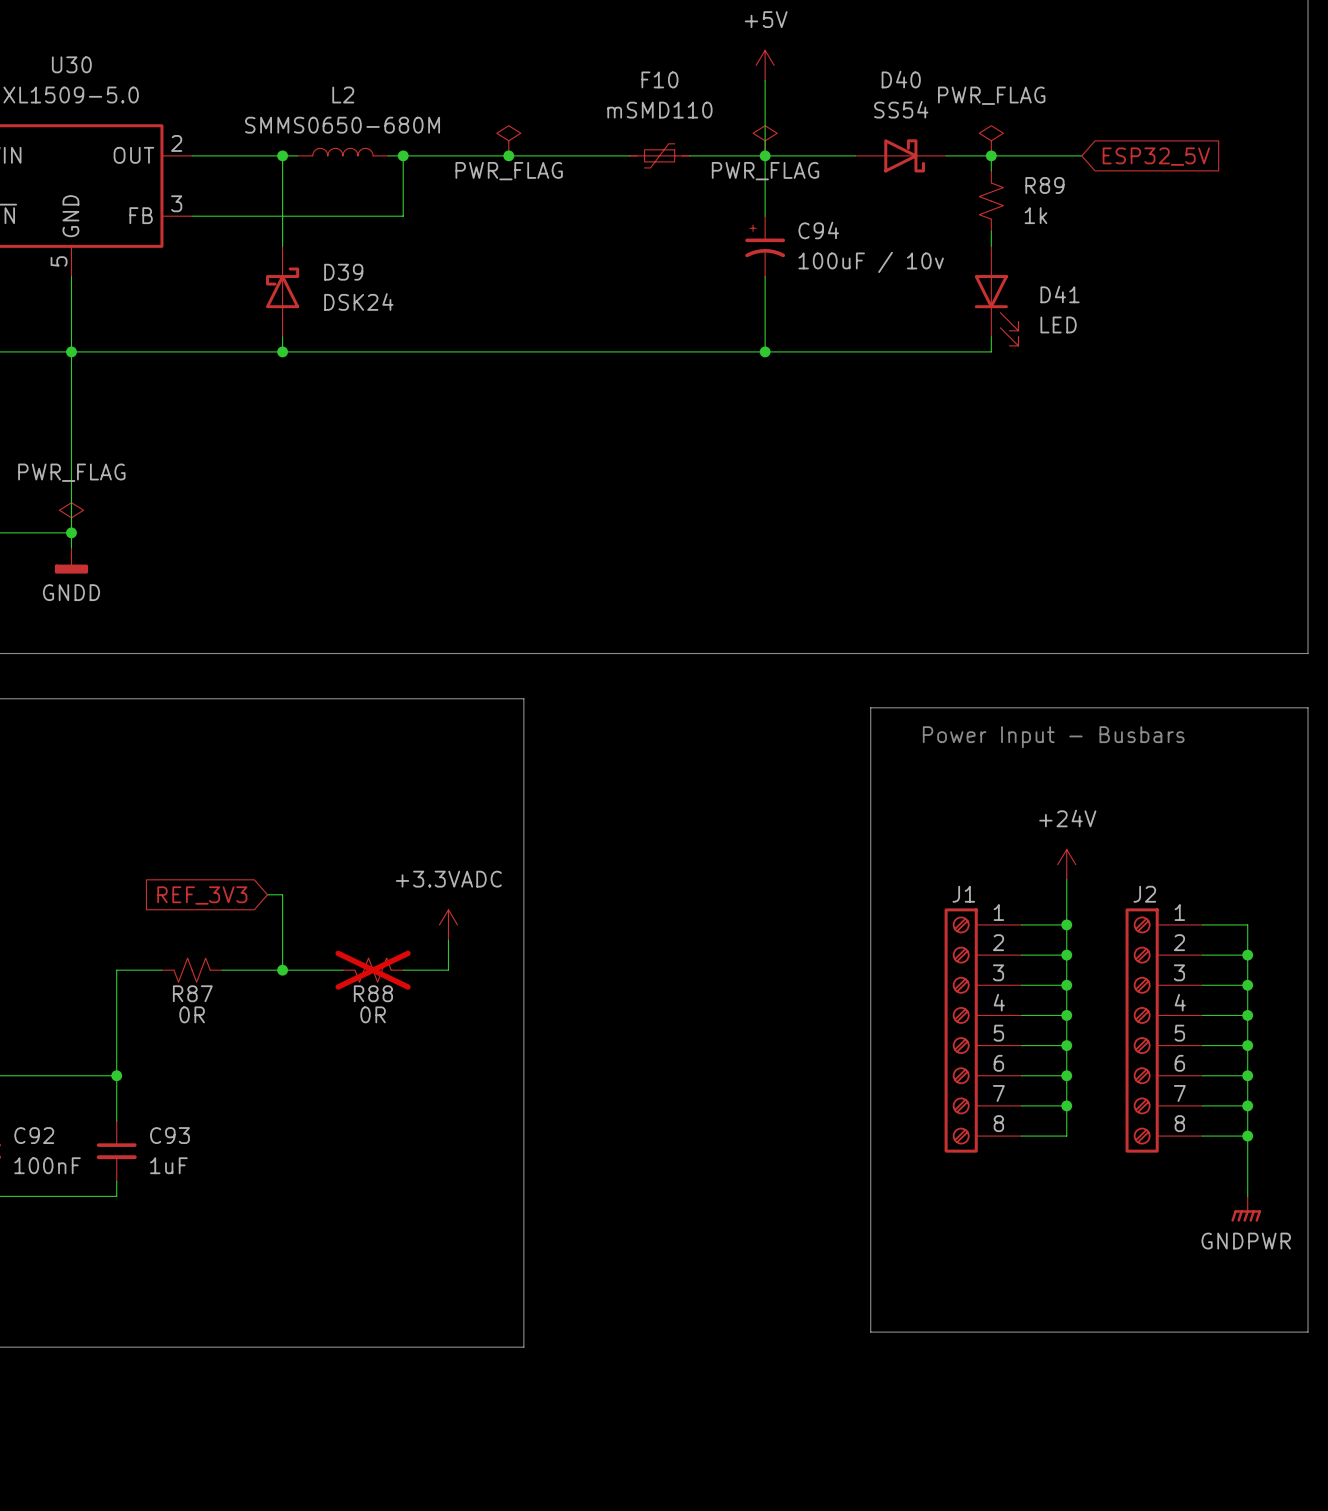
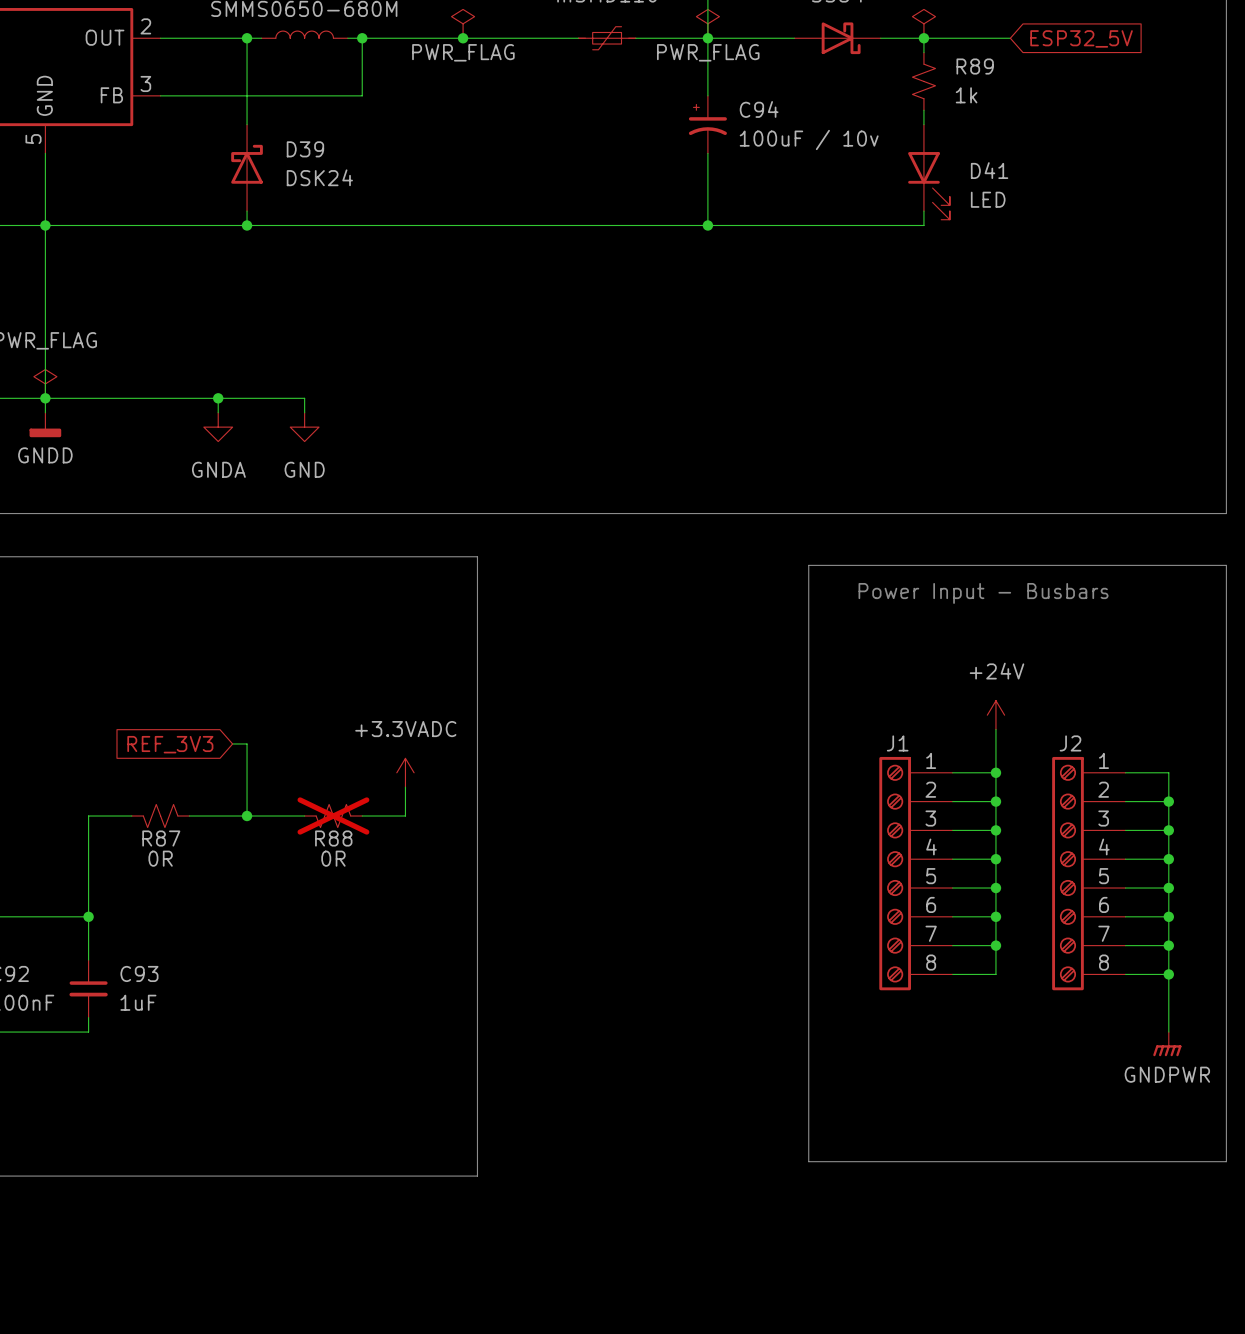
wire: none -> (45, 398) (304, 398) (304, 412)
wire: none -> (218, 398) (218, 412)
junction: none -> (218, 398)
power symbol: none -> GNDA (218, 427)
power symbol: none -> GND (304, 427)

